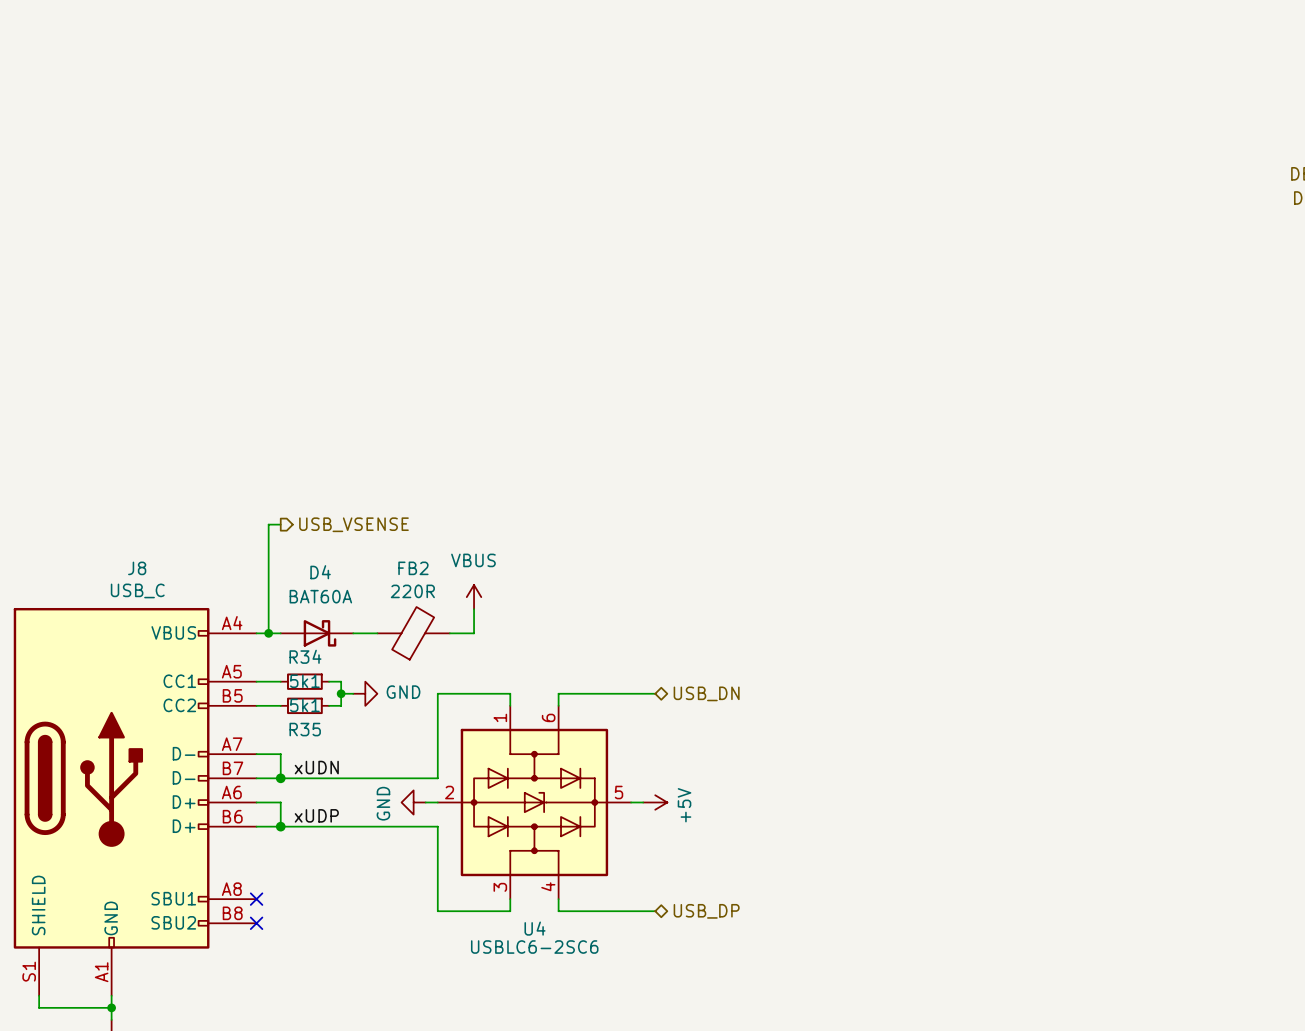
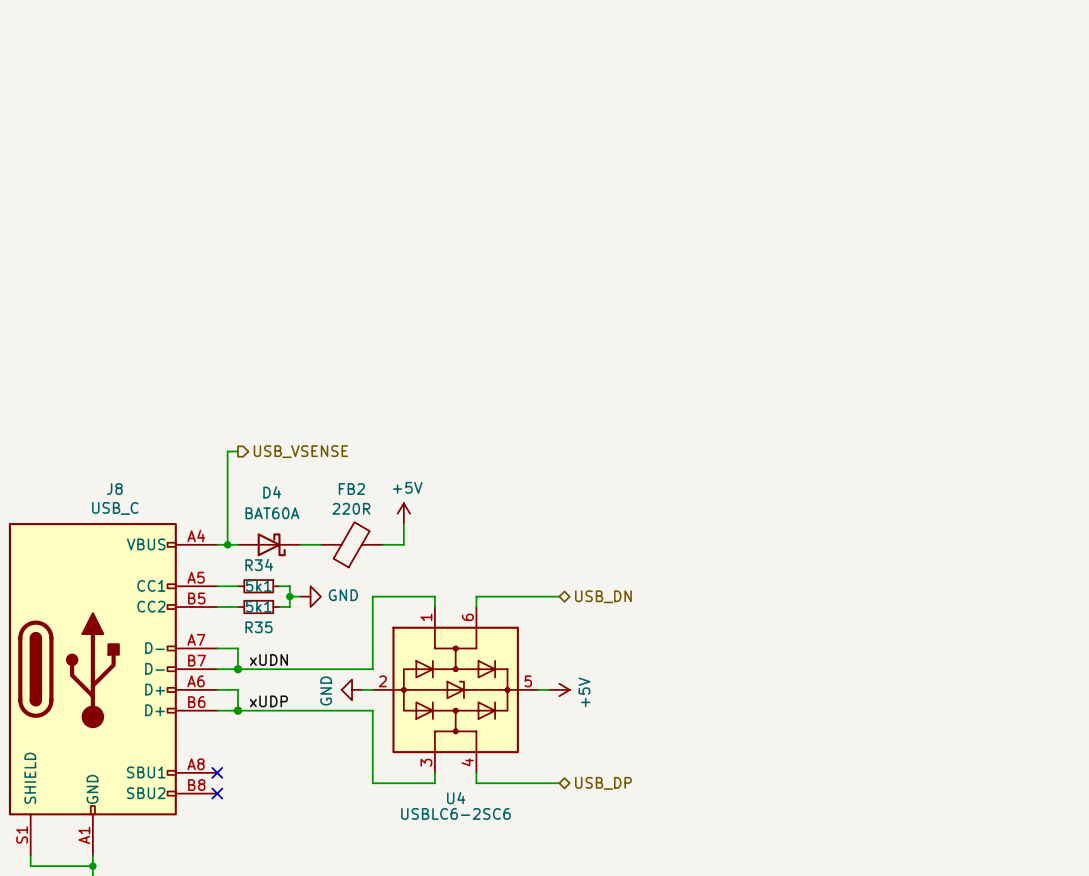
power symbol: VBUS (474, 597) -> +5V (403, 513)

